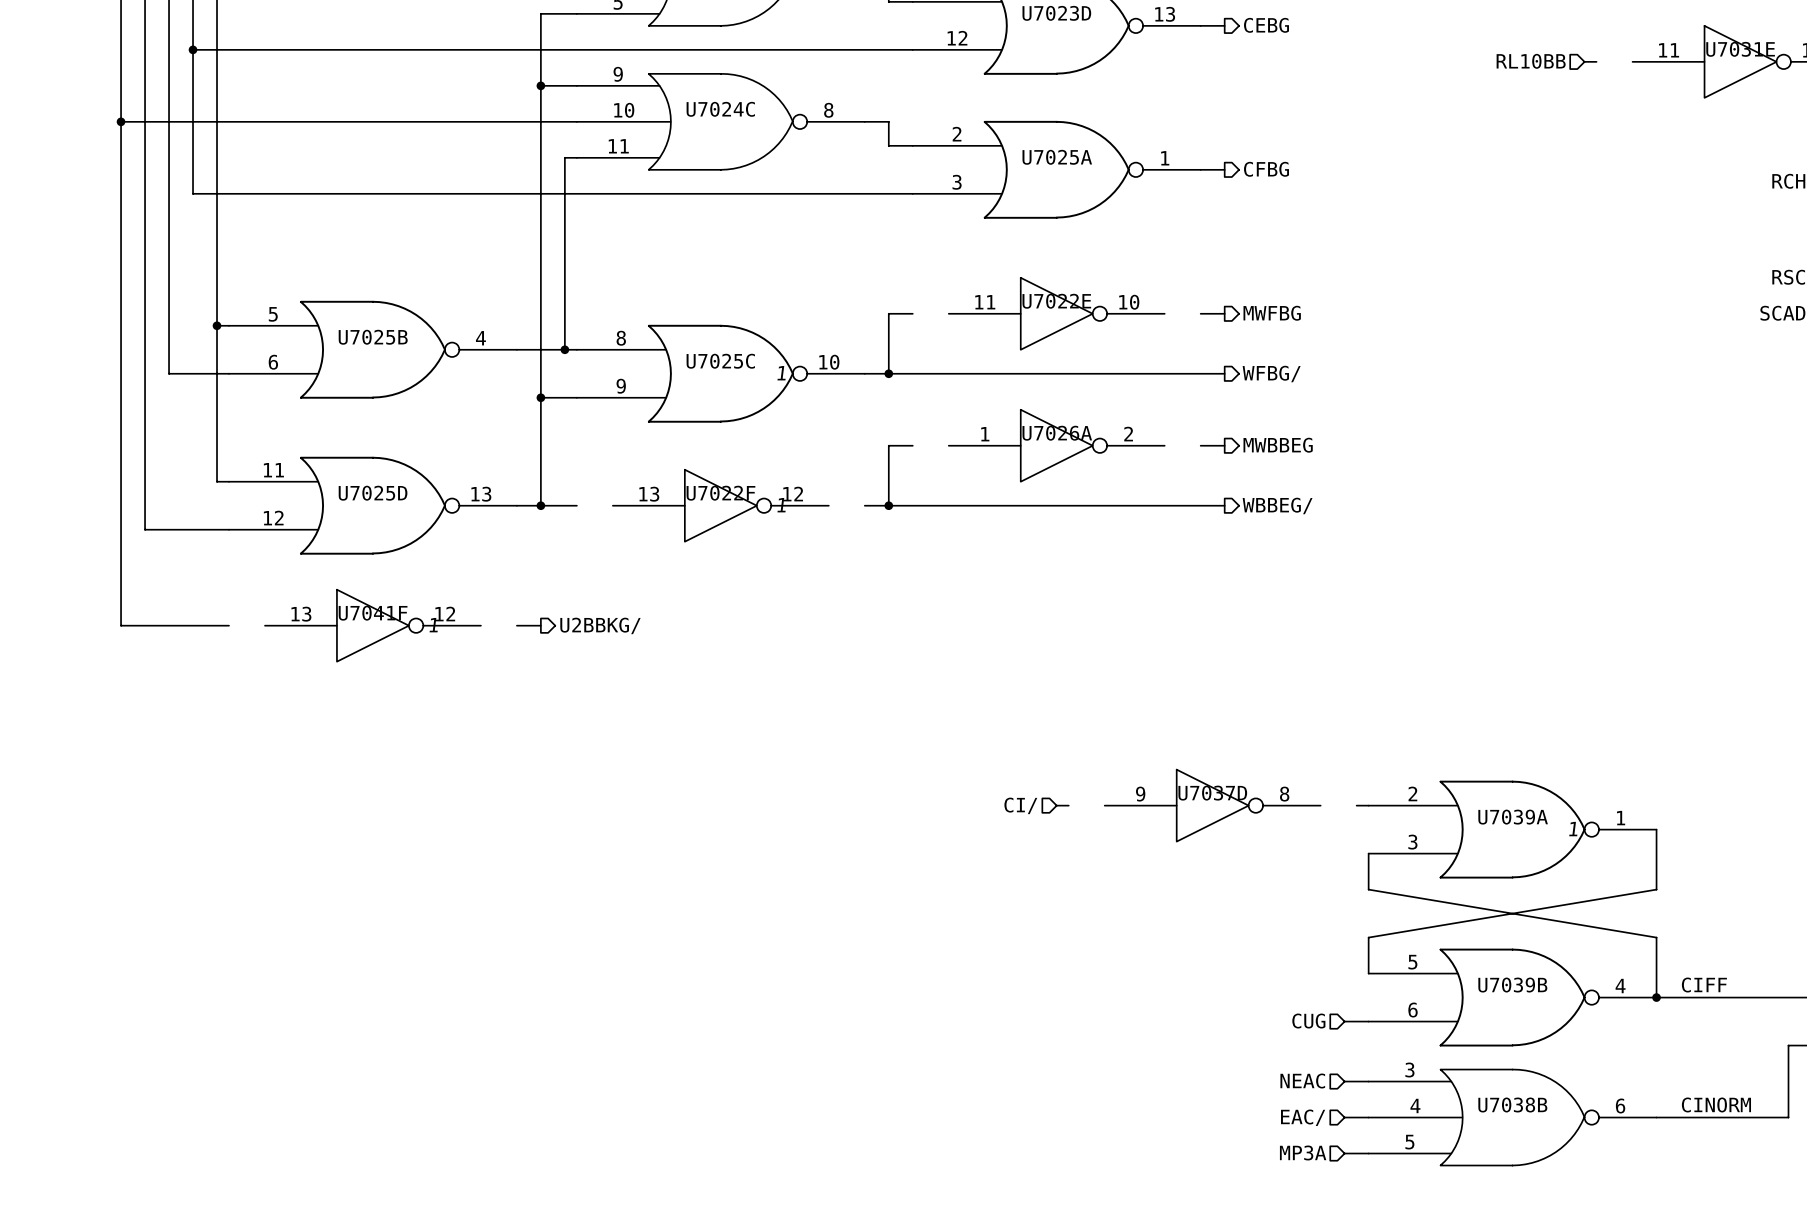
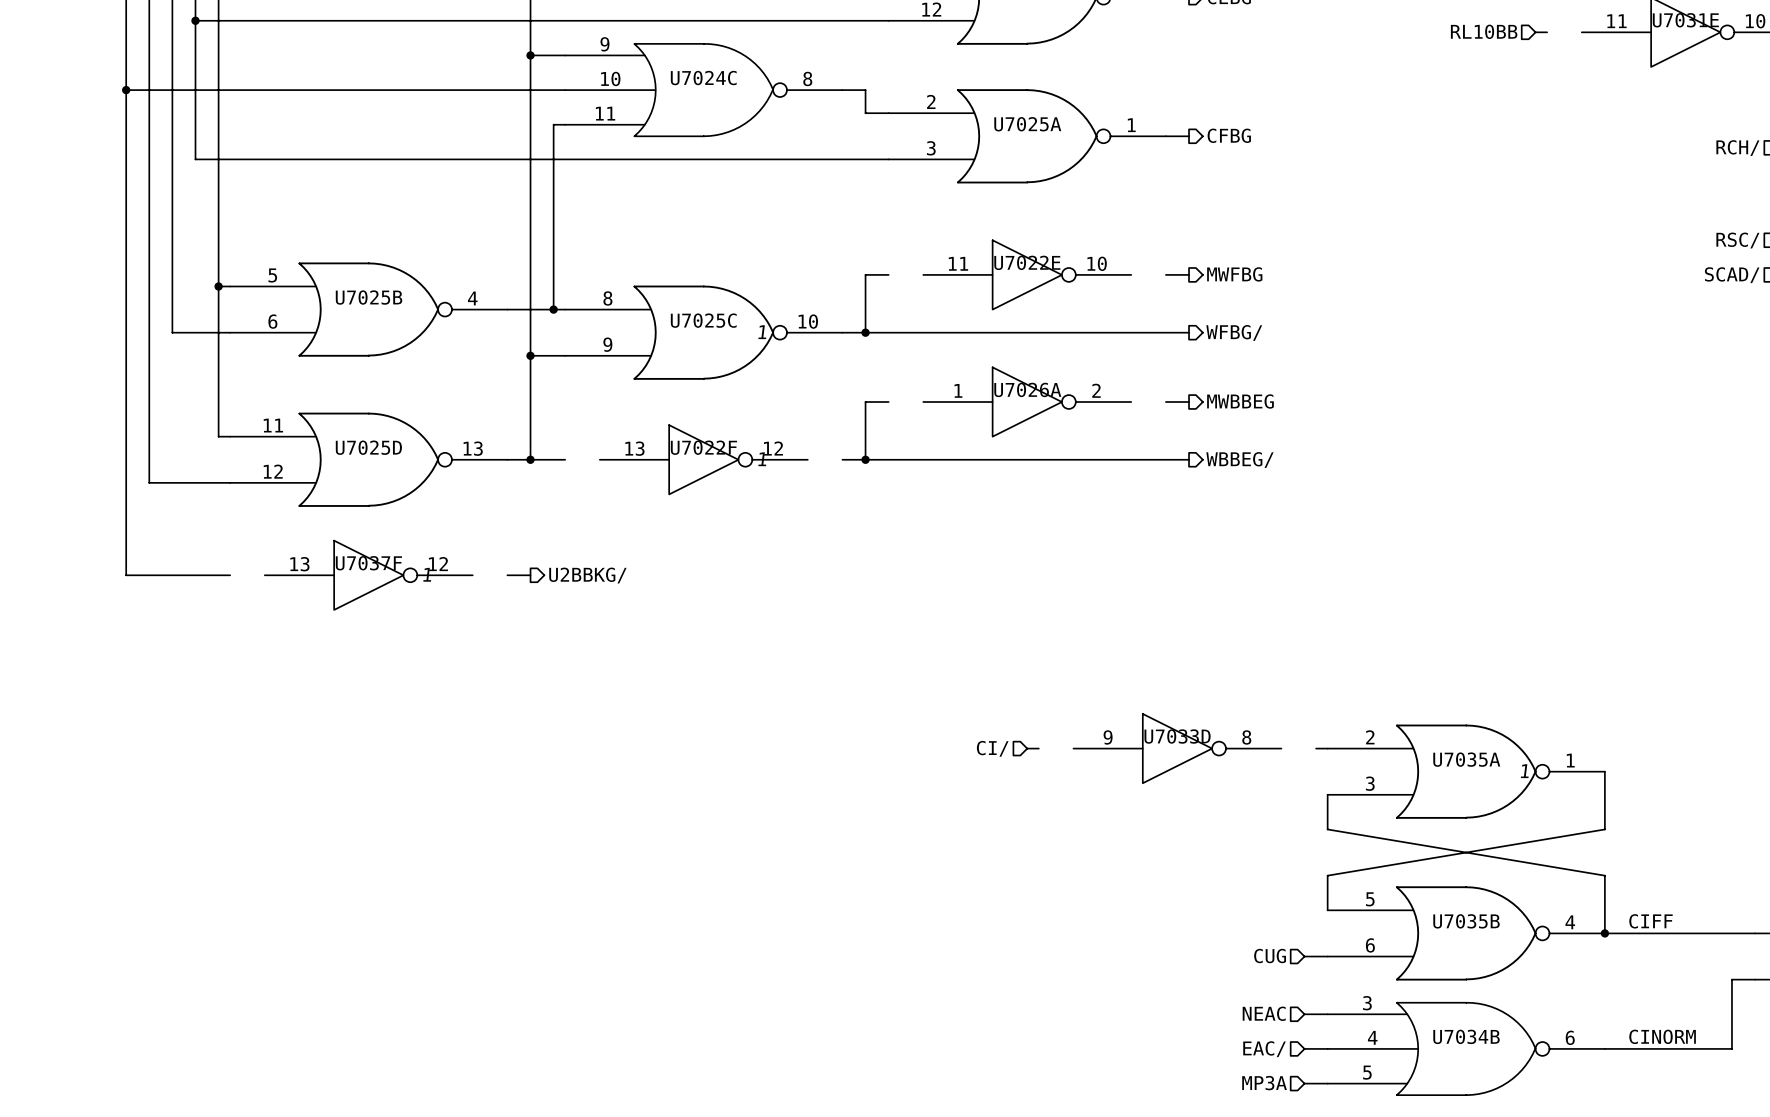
U7041F name: U7041F (373, 613) -> U7037F (368, 563)
U7037D name: U7037D (1212, 793) -> U7033D (1177, 736)
U7039A name: U7039A (1513, 817) -> U7035A (1466, 759)
U7039B name: U7039B (1512, 985) -> U7035B (1466, 921)
U7038B name: U7038B (1512, 1105) -> U7034B (1466, 1036)

